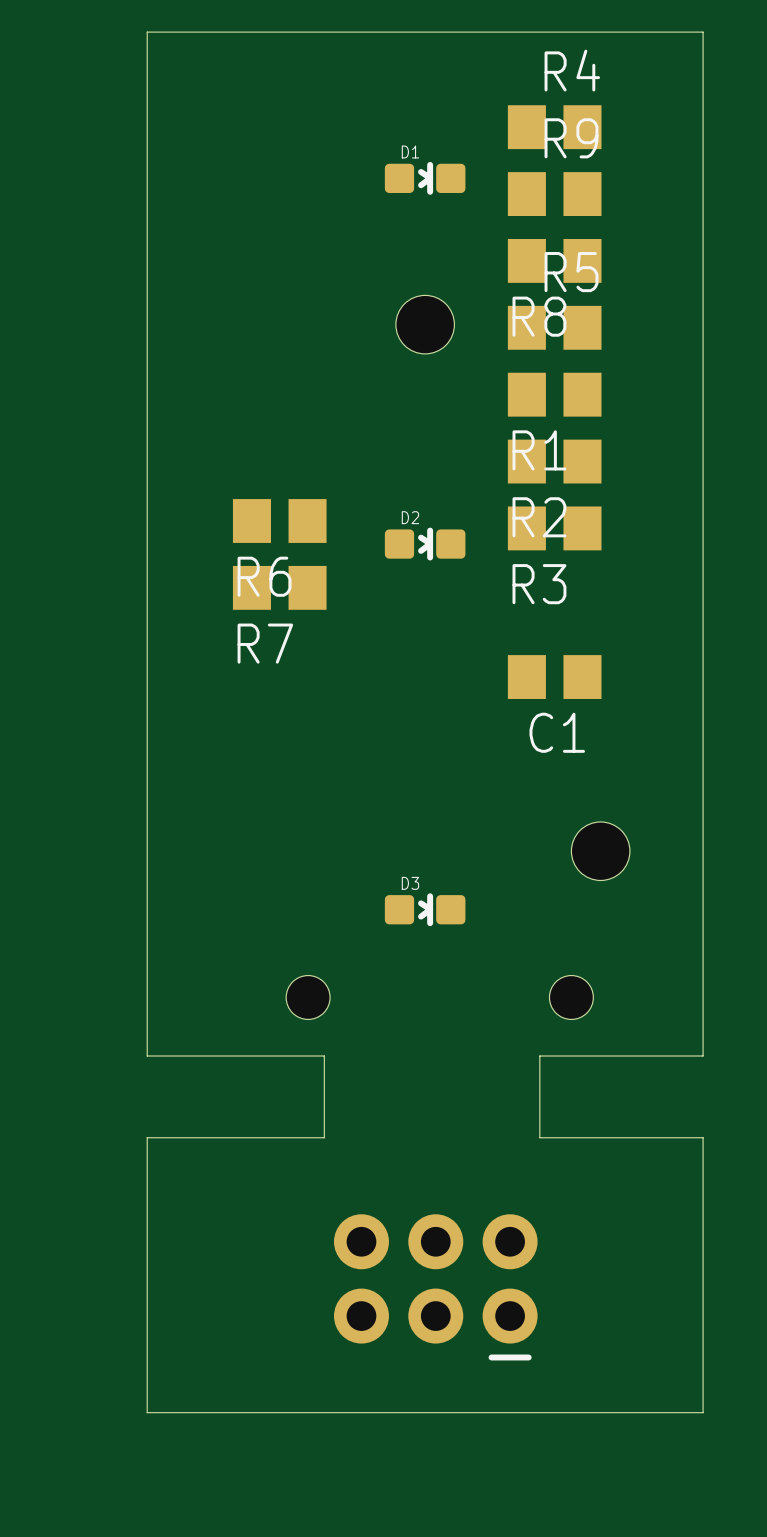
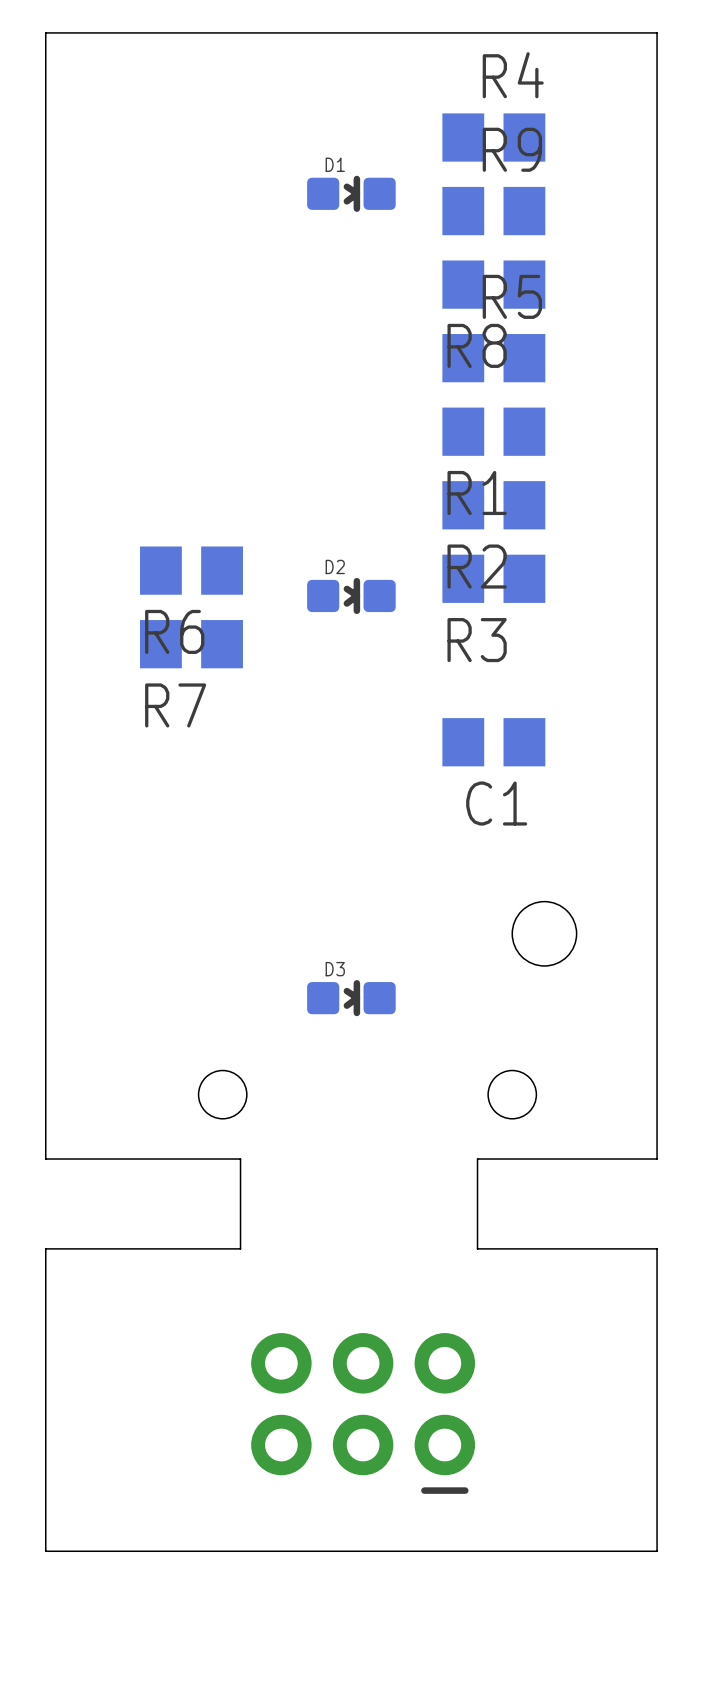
hole: (425, 324) -> none

